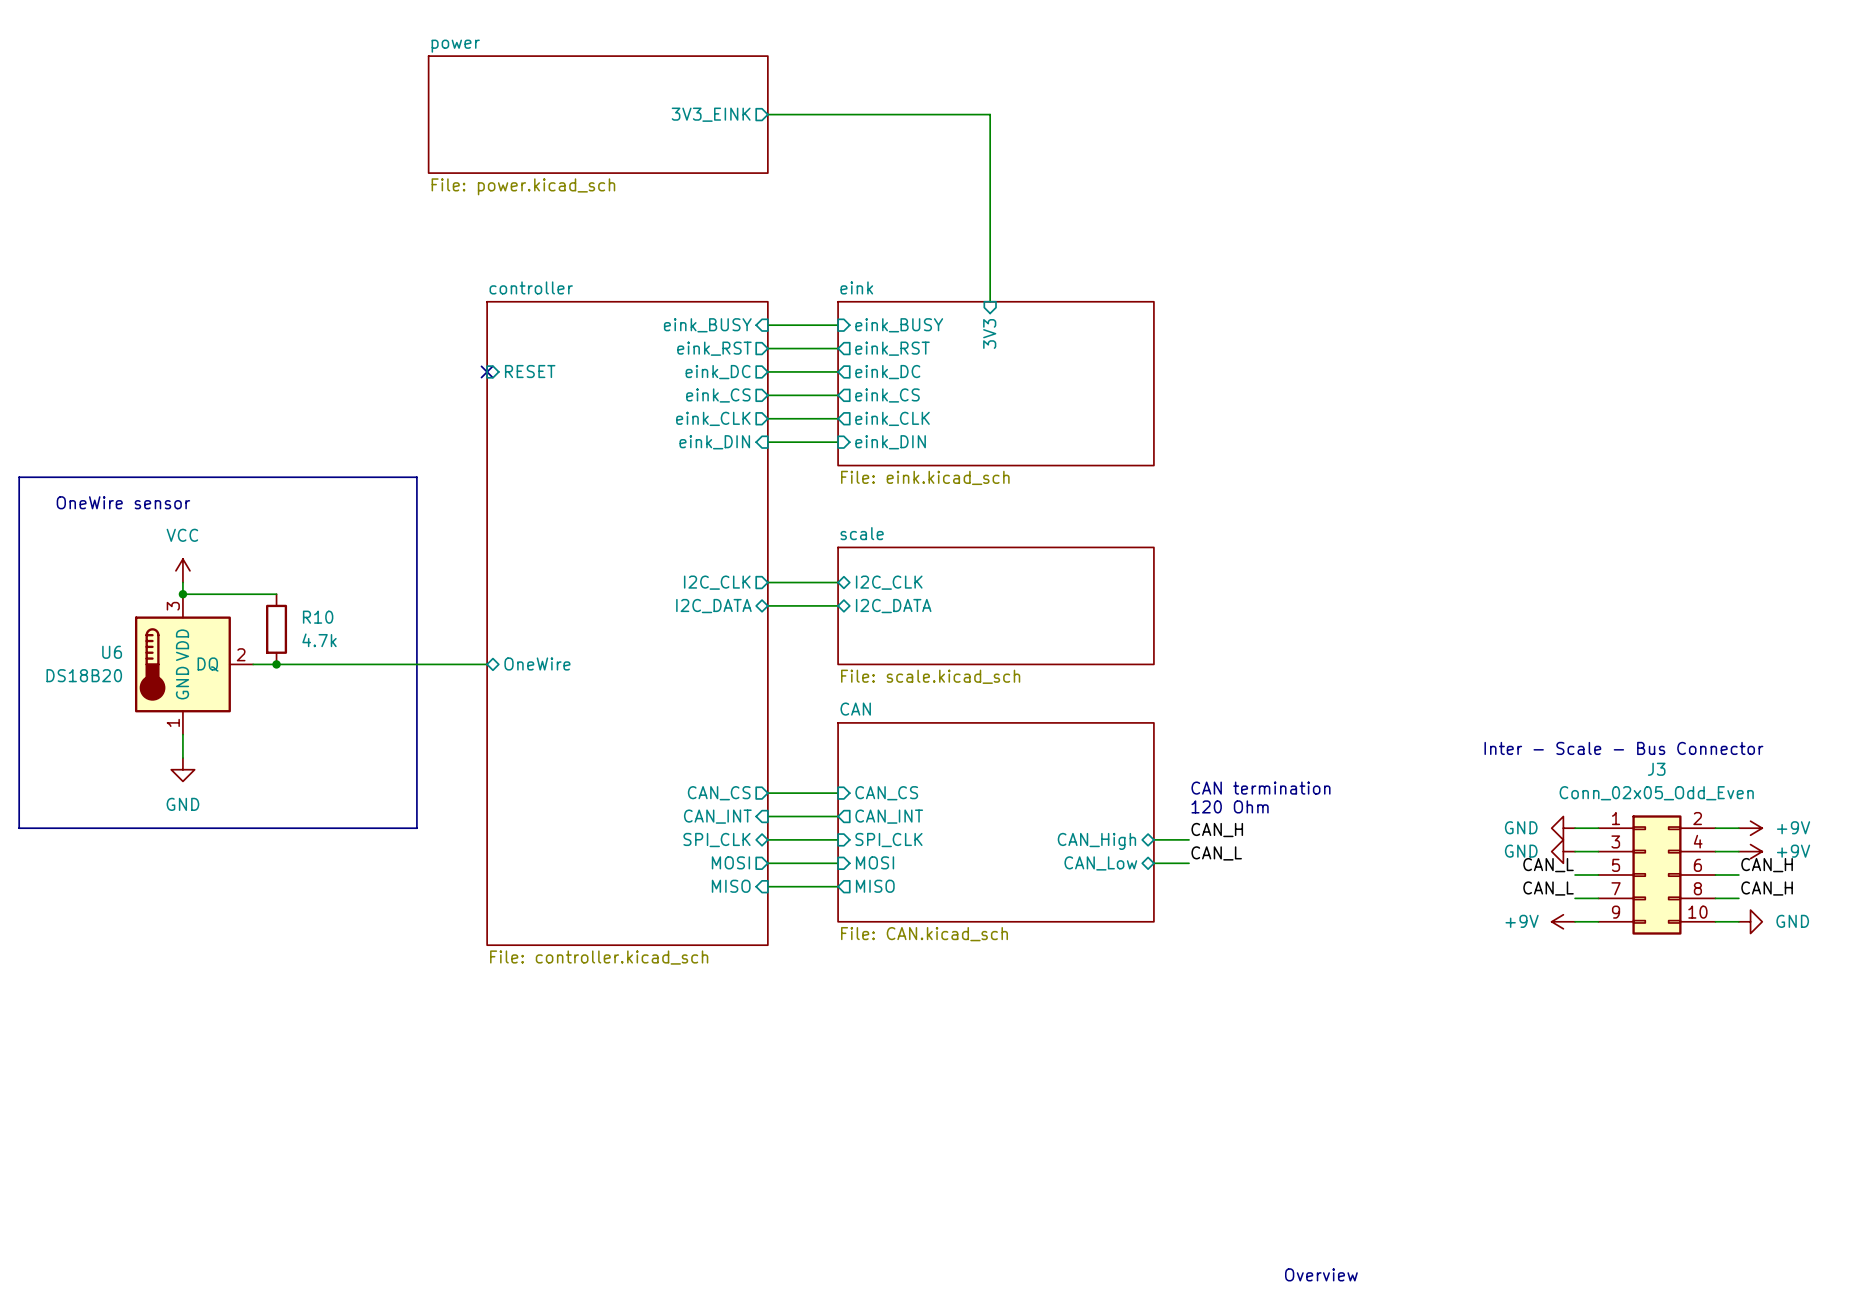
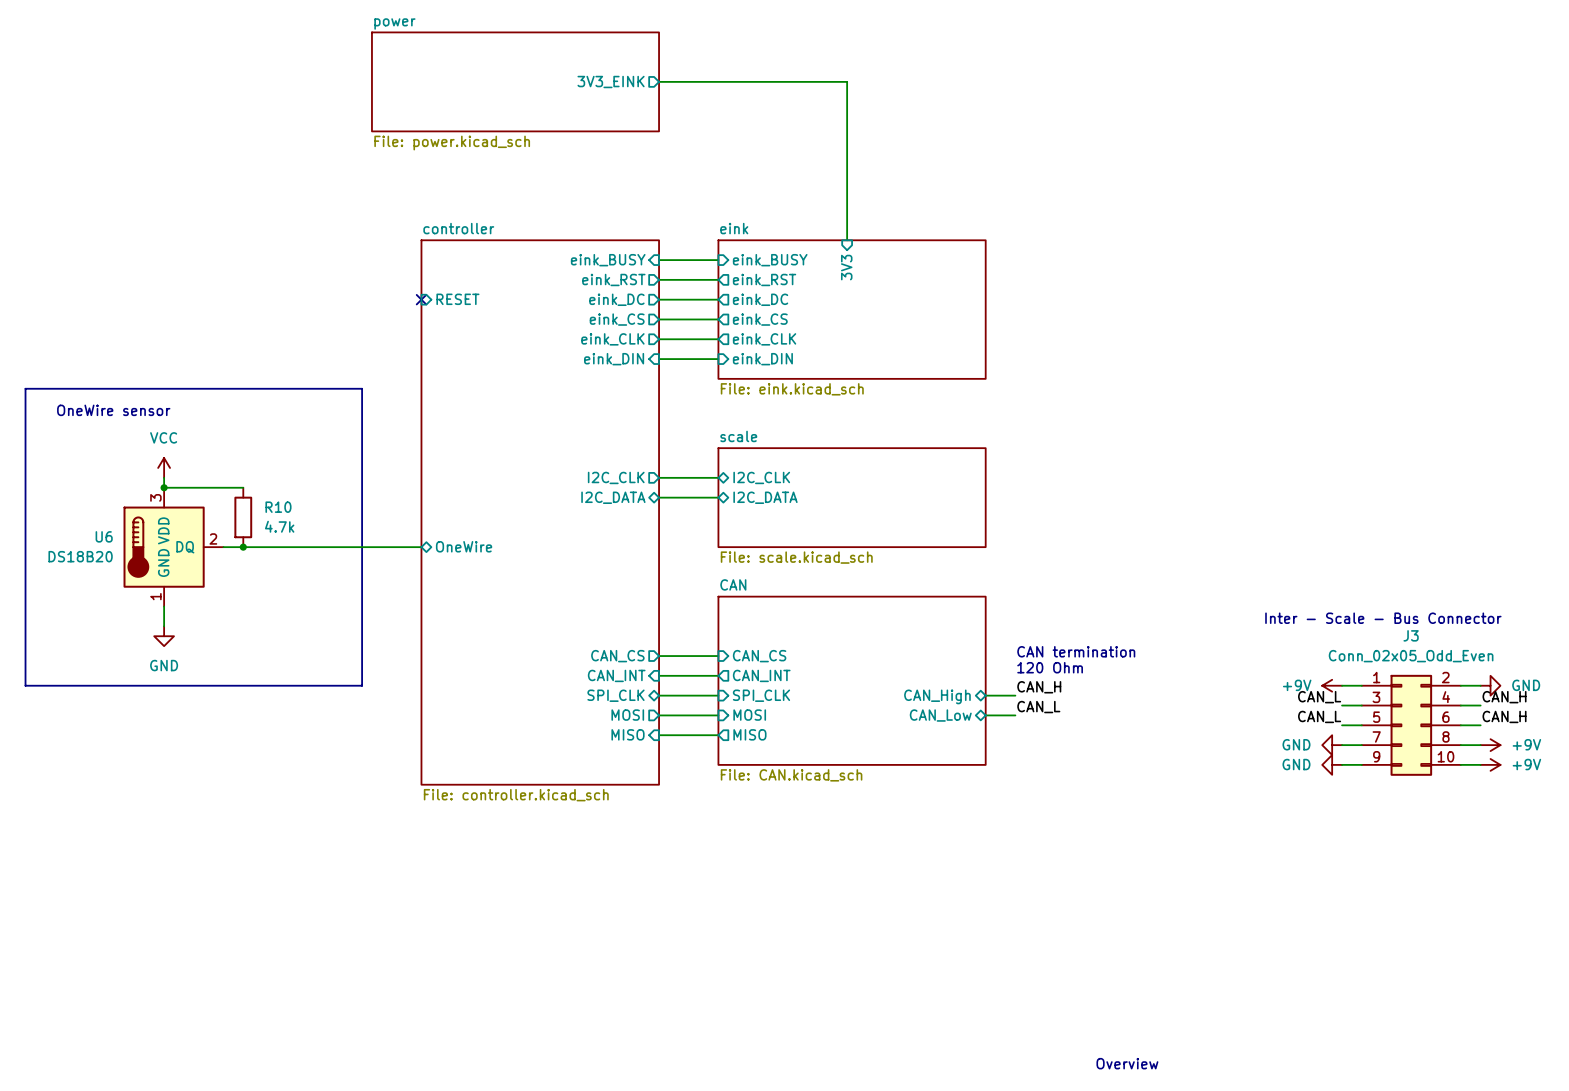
power symbol: GND (1563, 828) -> +9V (1332, 685)
power symbol: +9V (1750, 828) -> GND (1490, 685)
power symbol position: GND (1563, 851) -> GND (1332, 745)
power symbol position: +9V (1750, 851) -> +9V (1490, 745)
label position: CAN_L (1548, 888) -> CAN_L (1319, 697)
label position: CAN_H (1767, 888) -> CAN_H (1504, 697)
power symbol: +9V (1563, 921) -> GND (1332, 764)
power symbol: GND (1750, 921) -> +9V (1490, 764)

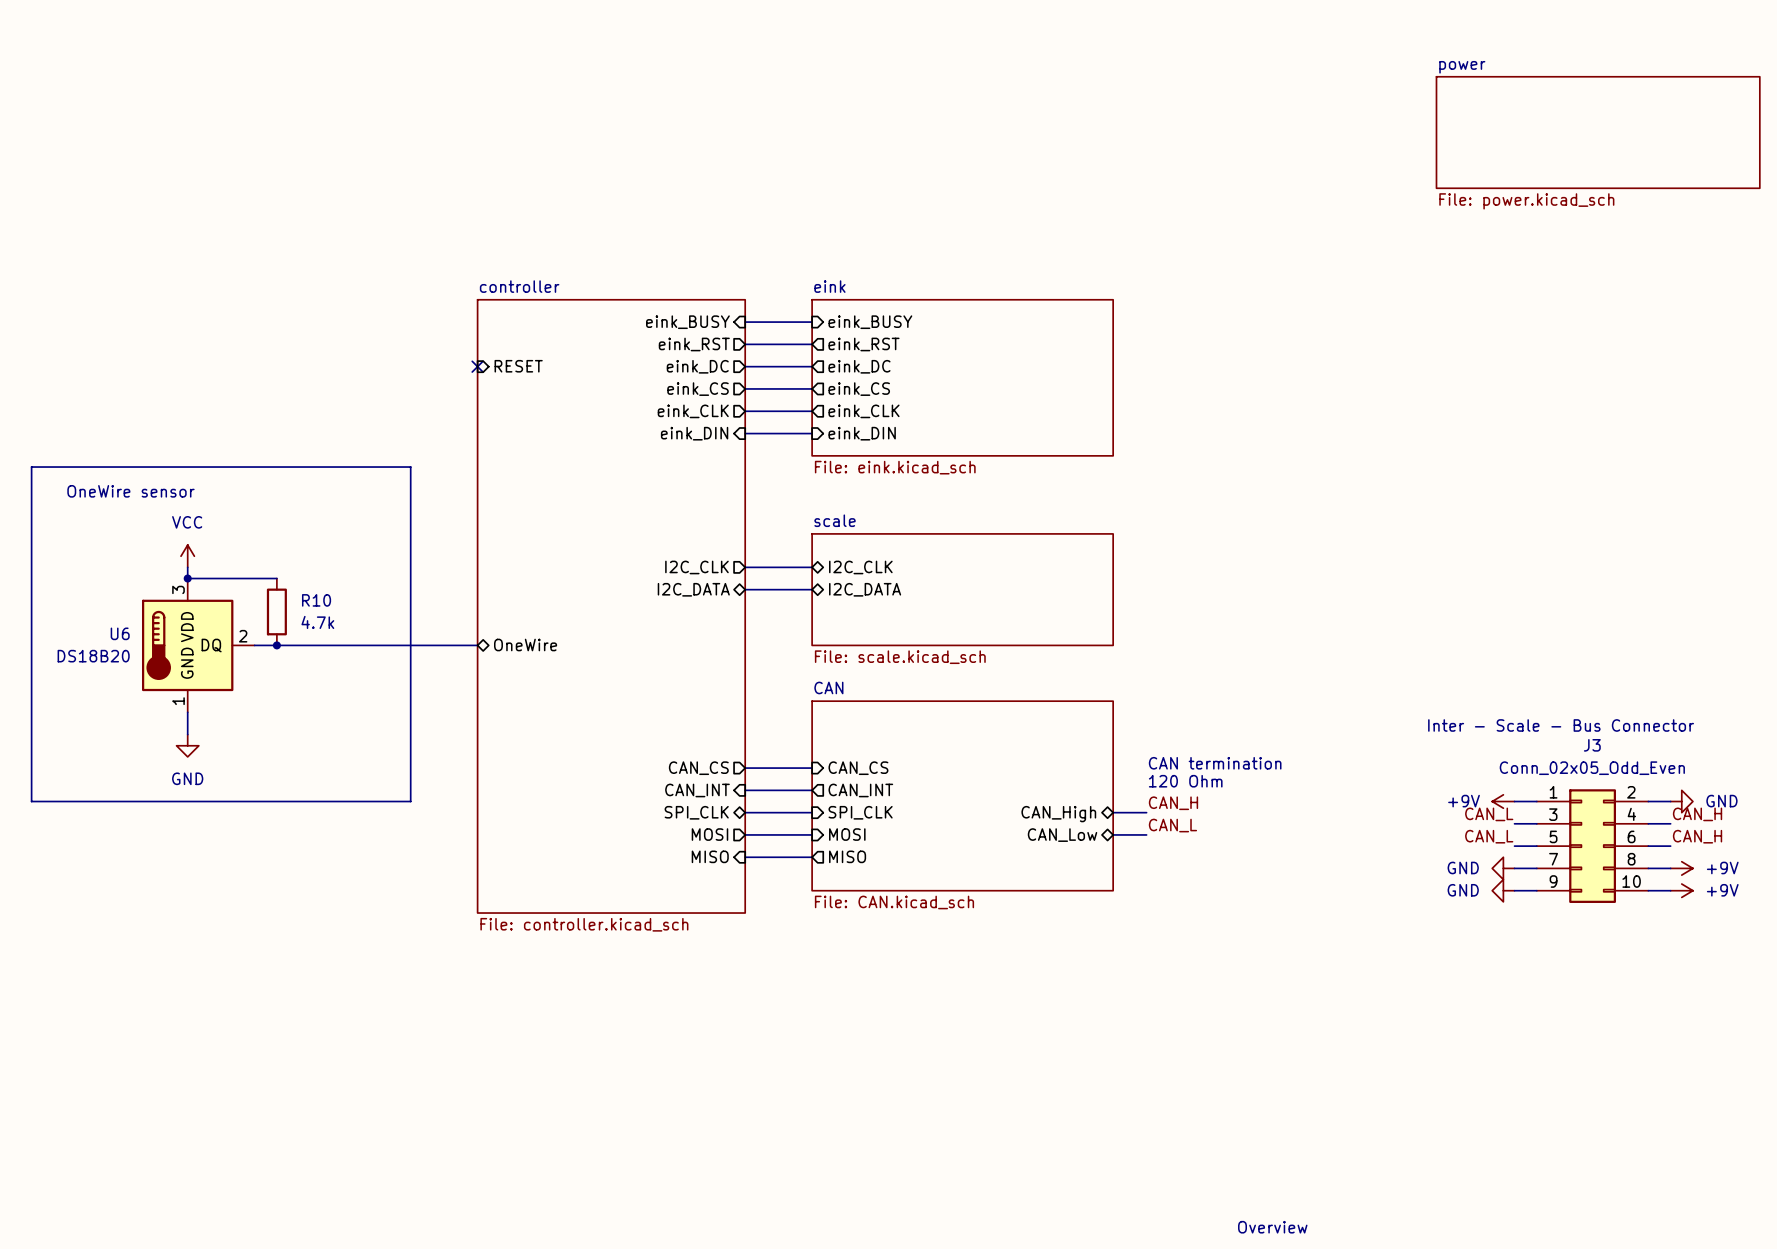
sheet power: File: power.kicad_sch (515, 81) -> none
wire: (659, 81) (847, 81) (847, 240) -> none
sheet pin: 3V3_EINK (611, 82) -> none
sheet power: none -> File: power.kicad_sch (1598, 132)
sheet pin: 3V3 (846, 267) -> none

